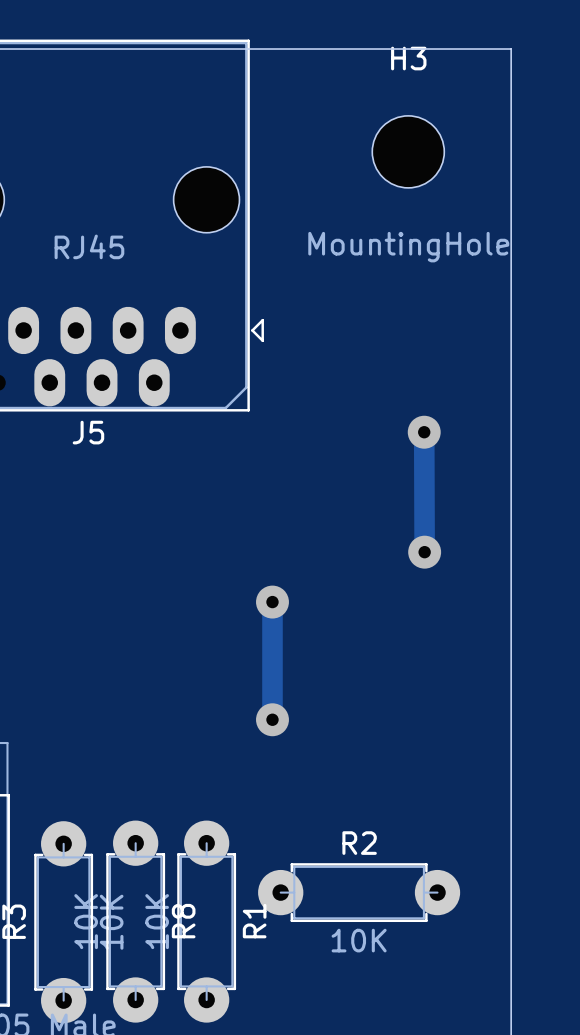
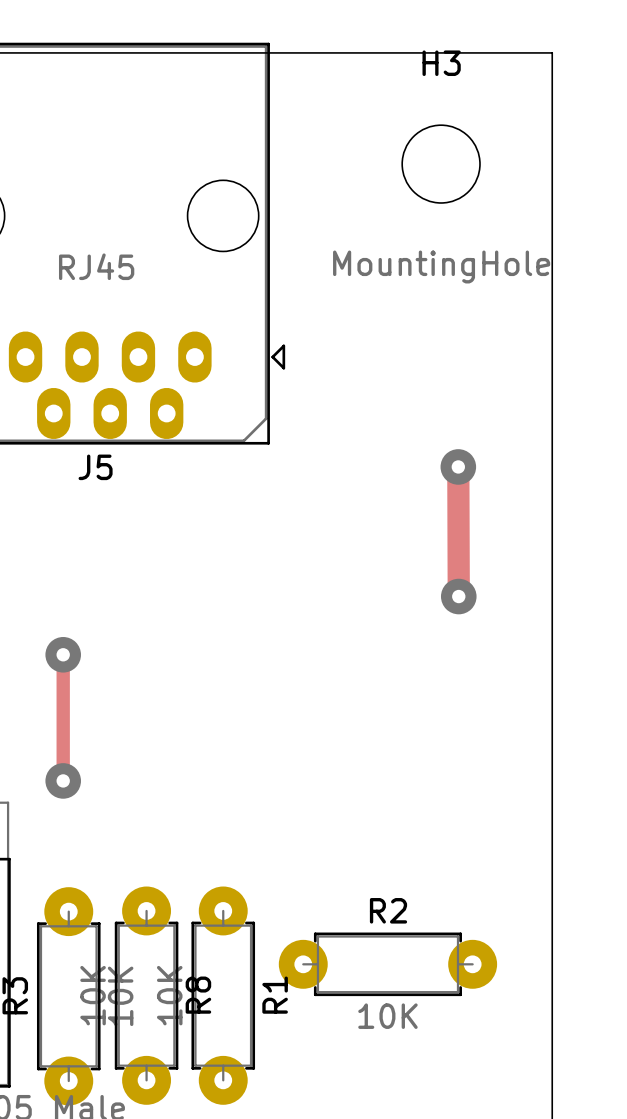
track: (272, 602) (272, 719) -> none
via: (272, 602) -> none
track: none -> (63, 654) (63, 780)
via: none -> (63, 654)
via: (272, 719) -> none
via: none -> (63, 780)

